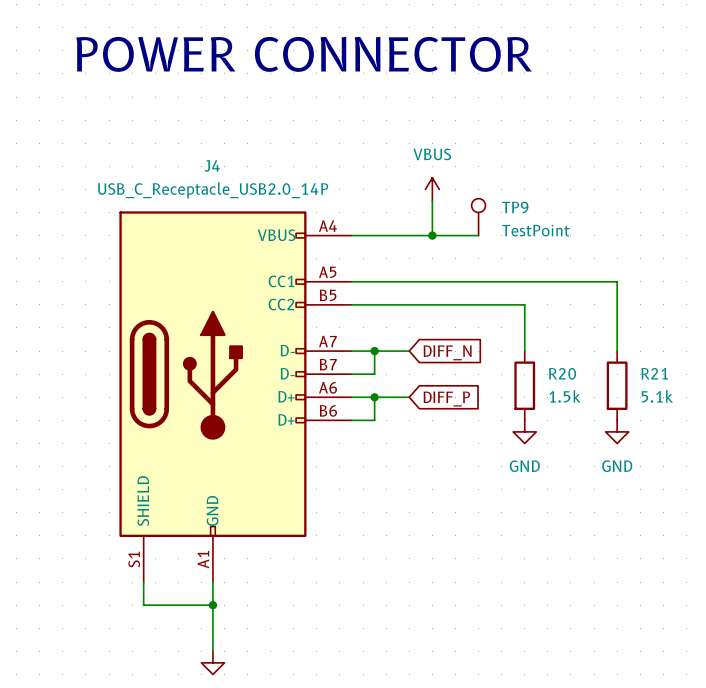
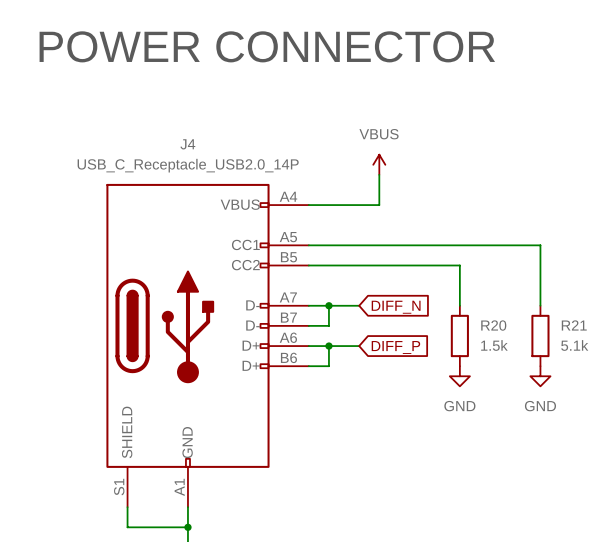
TP9: TestPoint (478, 217) -> none
wire: (432, 235) (478, 235) -> none
junction: (432, 235) -> none

